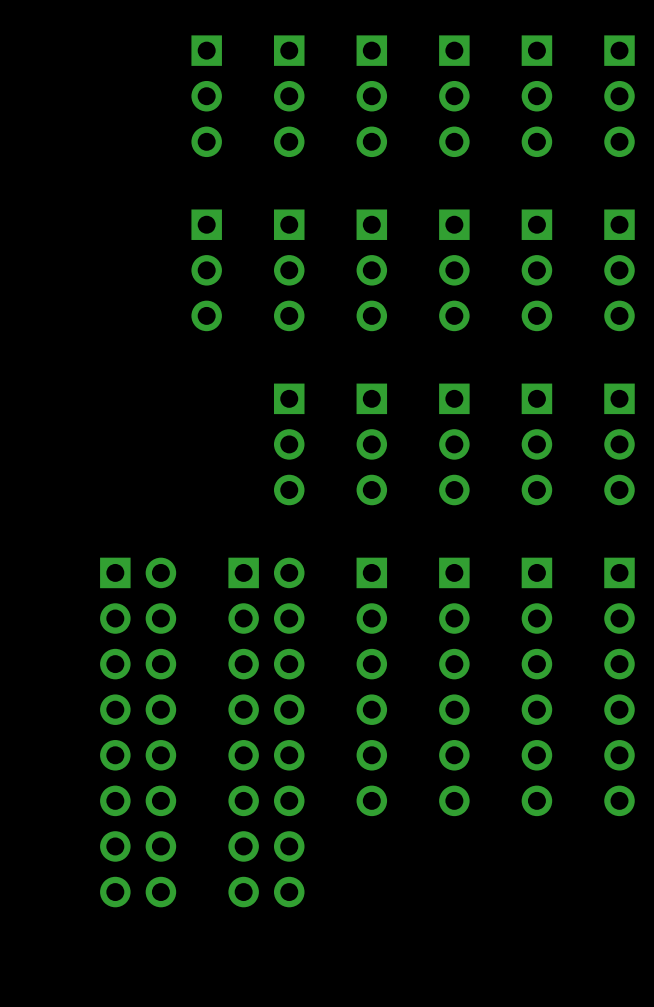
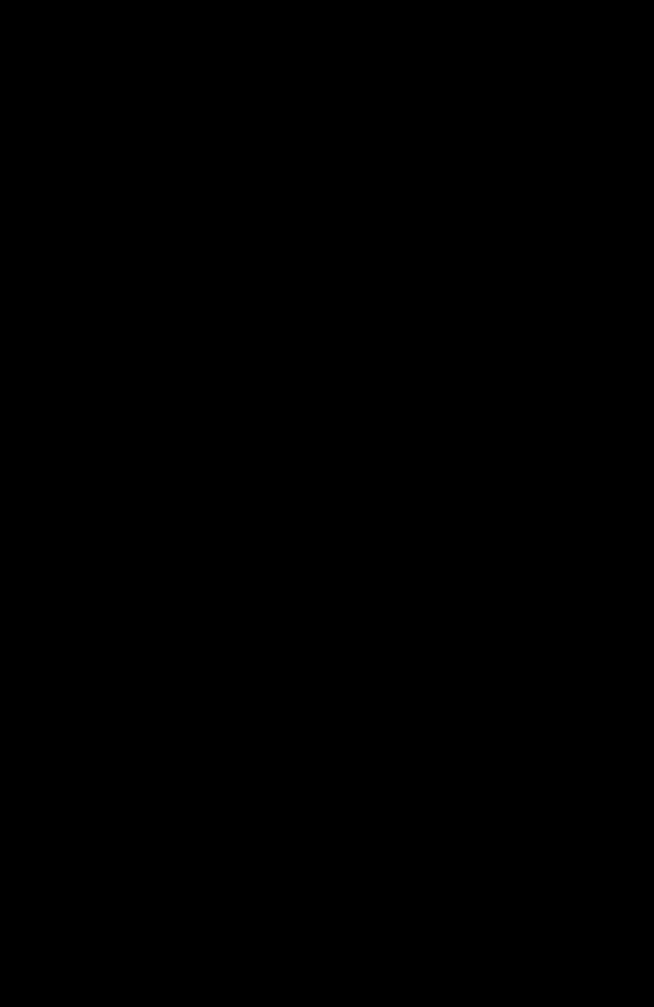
part: (206, 96) -> none
part: (289, 96) -> none
part: (371, 96) -> none
part: (454, 96) -> none
part: (536, 96) -> none
part: (619, 96) -> none
part: (206, 270) -> none
part: (289, 270) -> none
part: (371, 270) -> none
part: (454, 270) -> none
part: (536, 270) -> none
part: (619, 270) -> none
part: (289, 444) -> none
part: (371, 444) -> none
part: (454, 444) -> none
part: (536, 444) -> none
part: (619, 444) -> none
part: (371, 686) -> none
part: (454, 686) -> none
part: (536, 686) -> none
part: (619, 686) -> none
part: (138, 732) -> none
part: (266, 732) -> none

